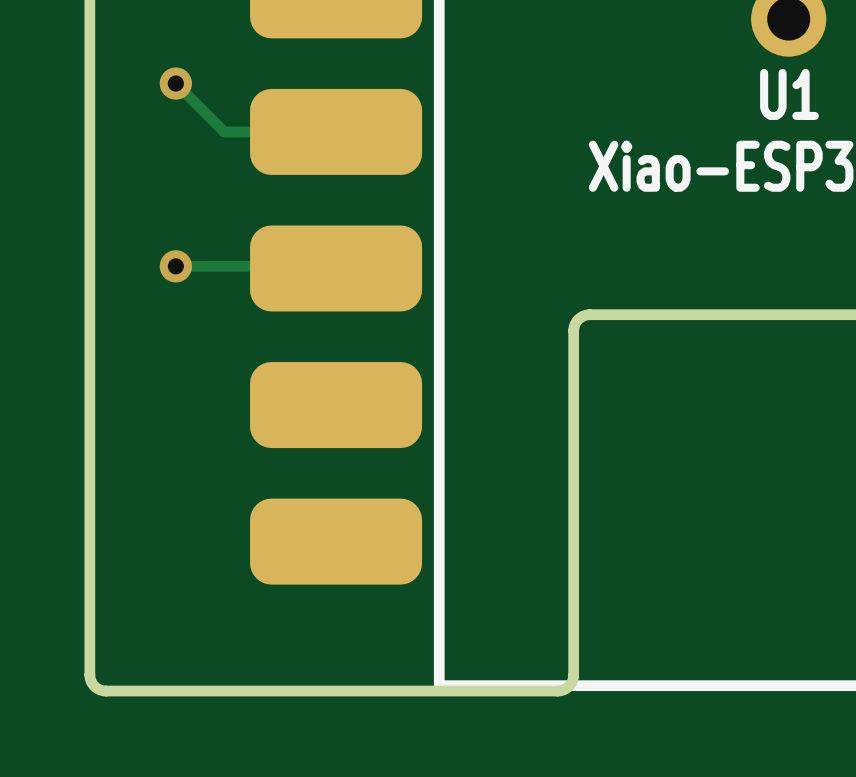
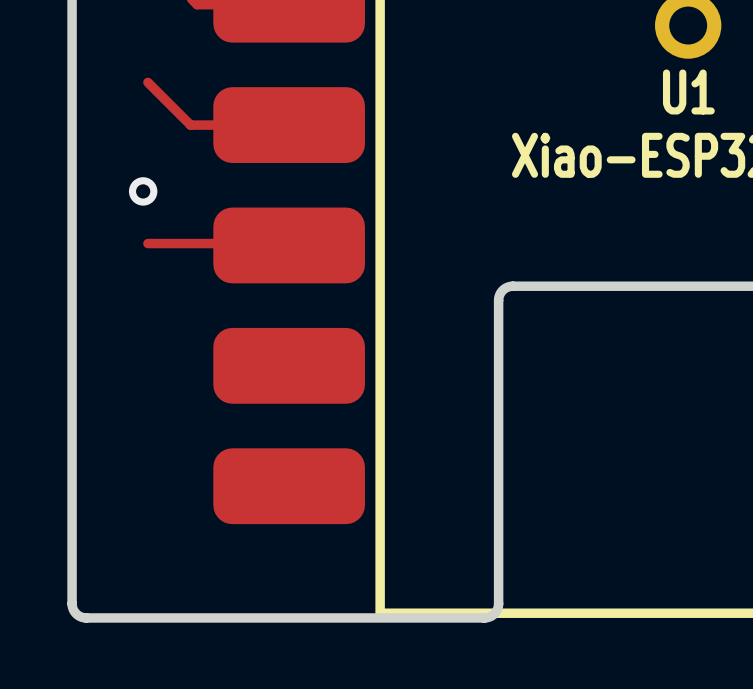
via: (175, 83) -> none
via position: (175, 266) -> (143, 191)

